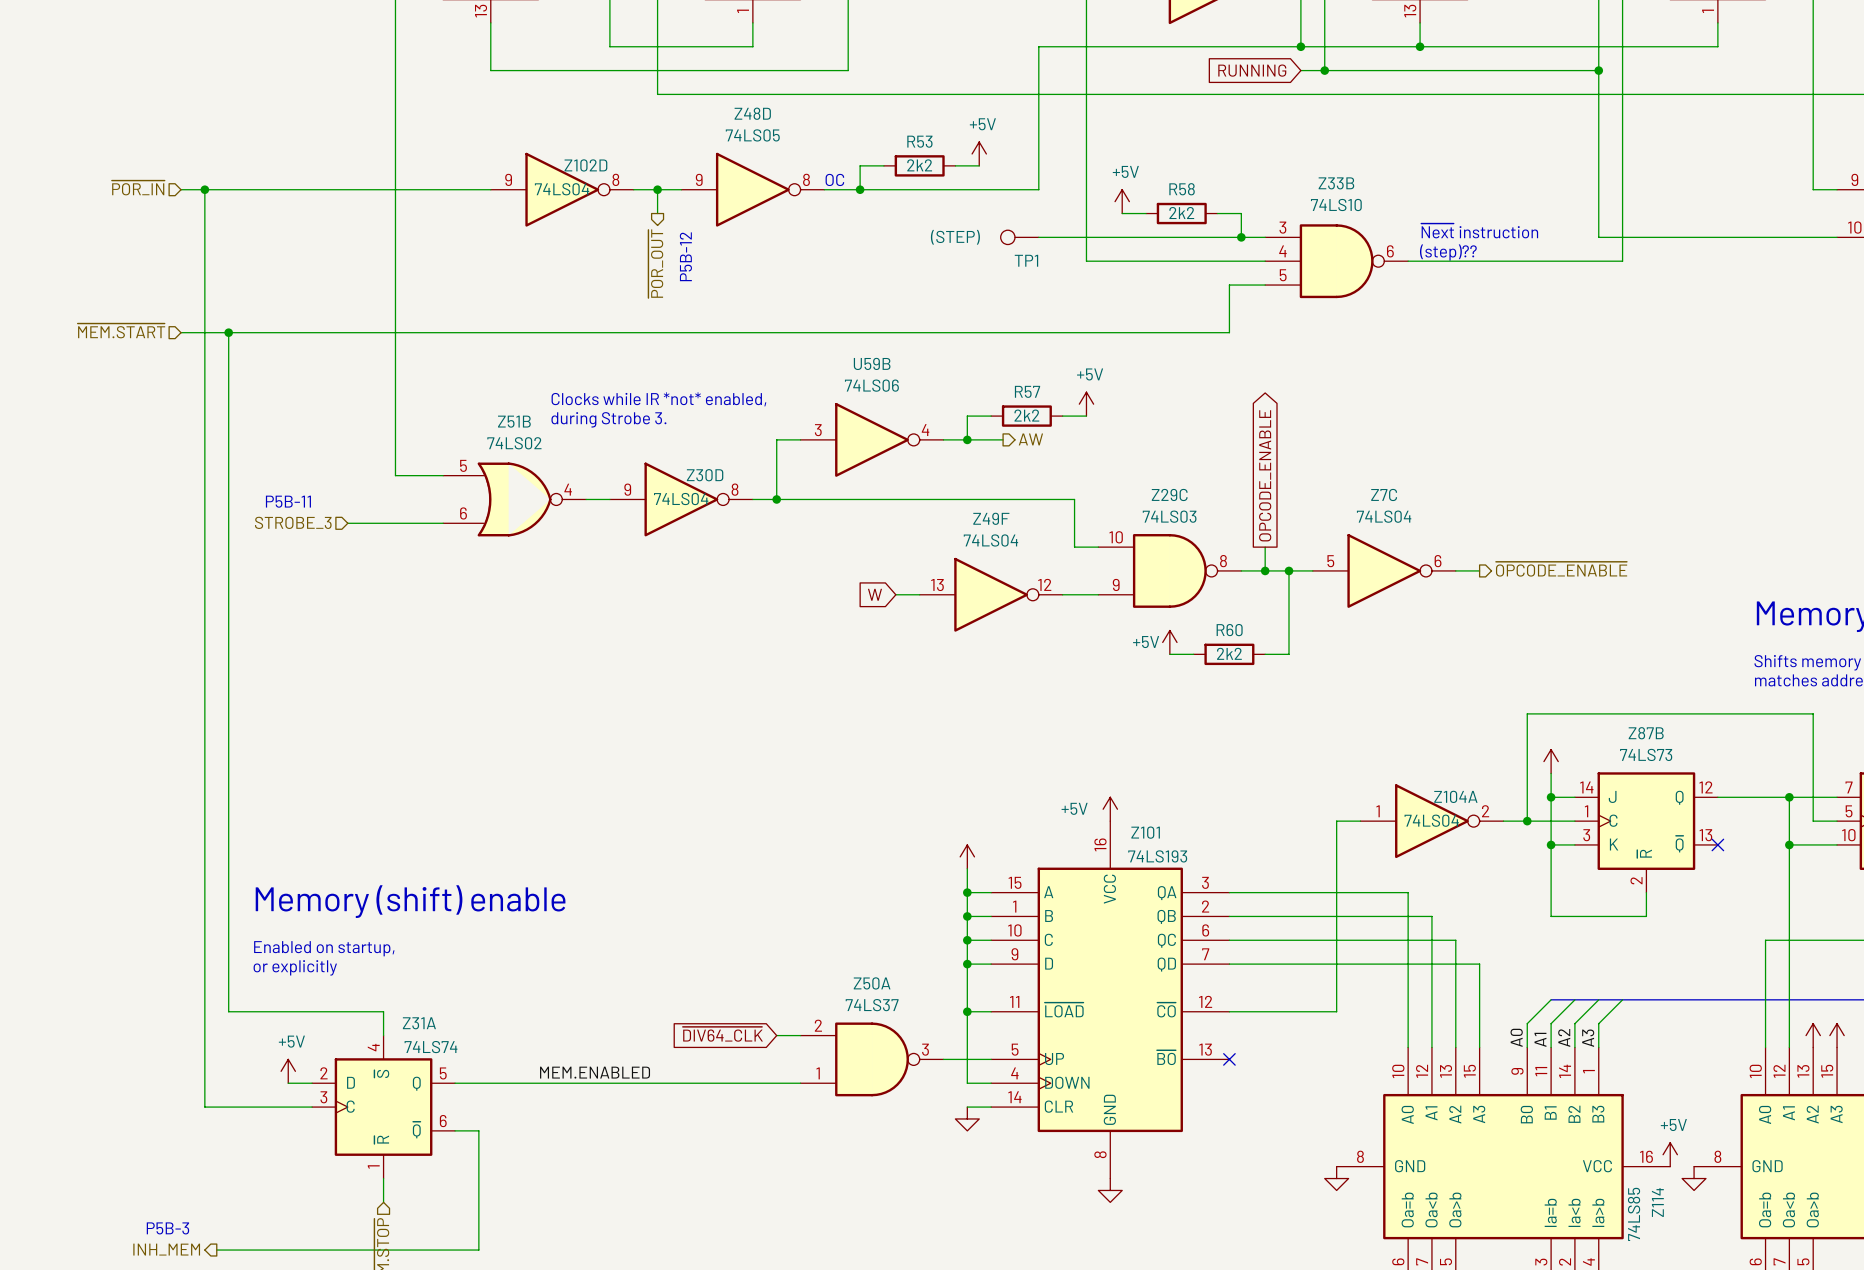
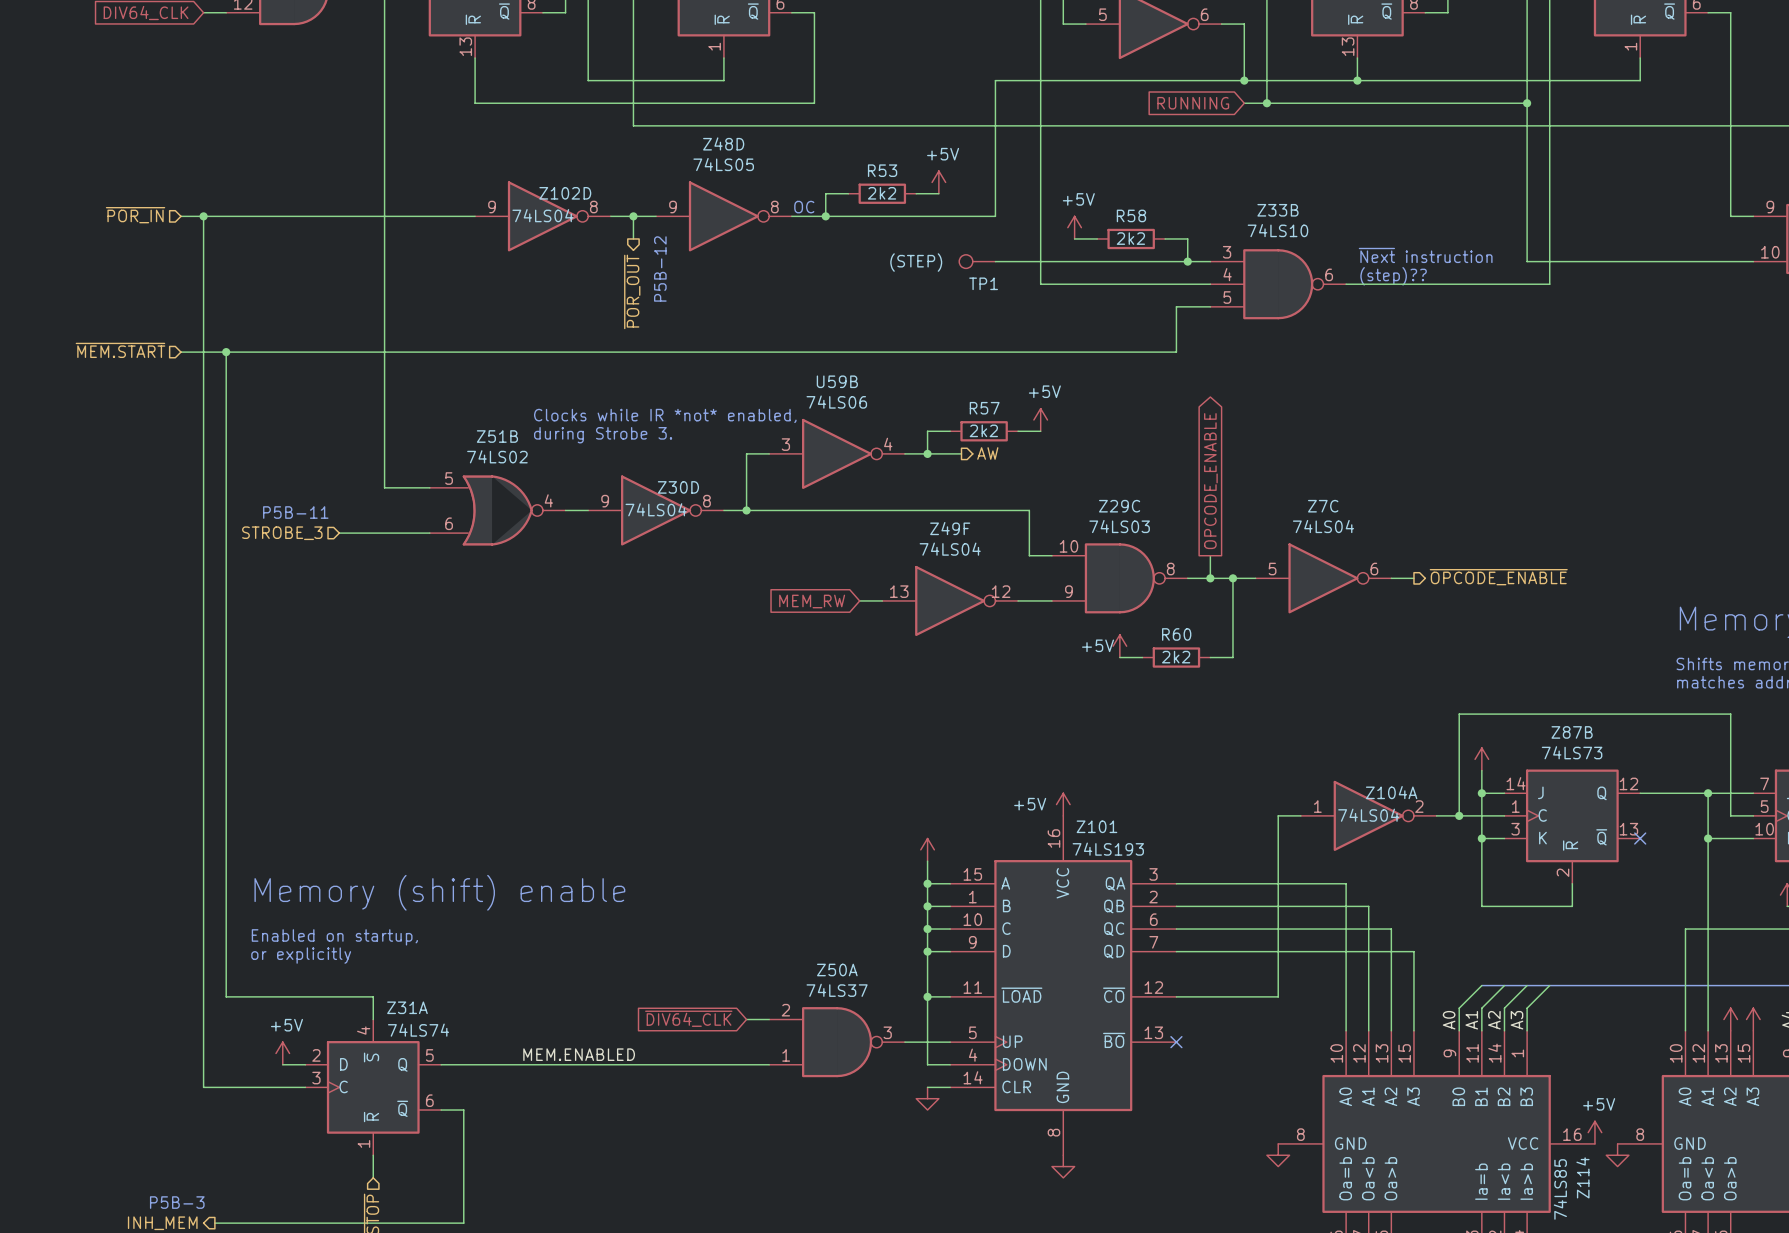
global label: W (874, 594) -> MEM_RW (812, 601)

